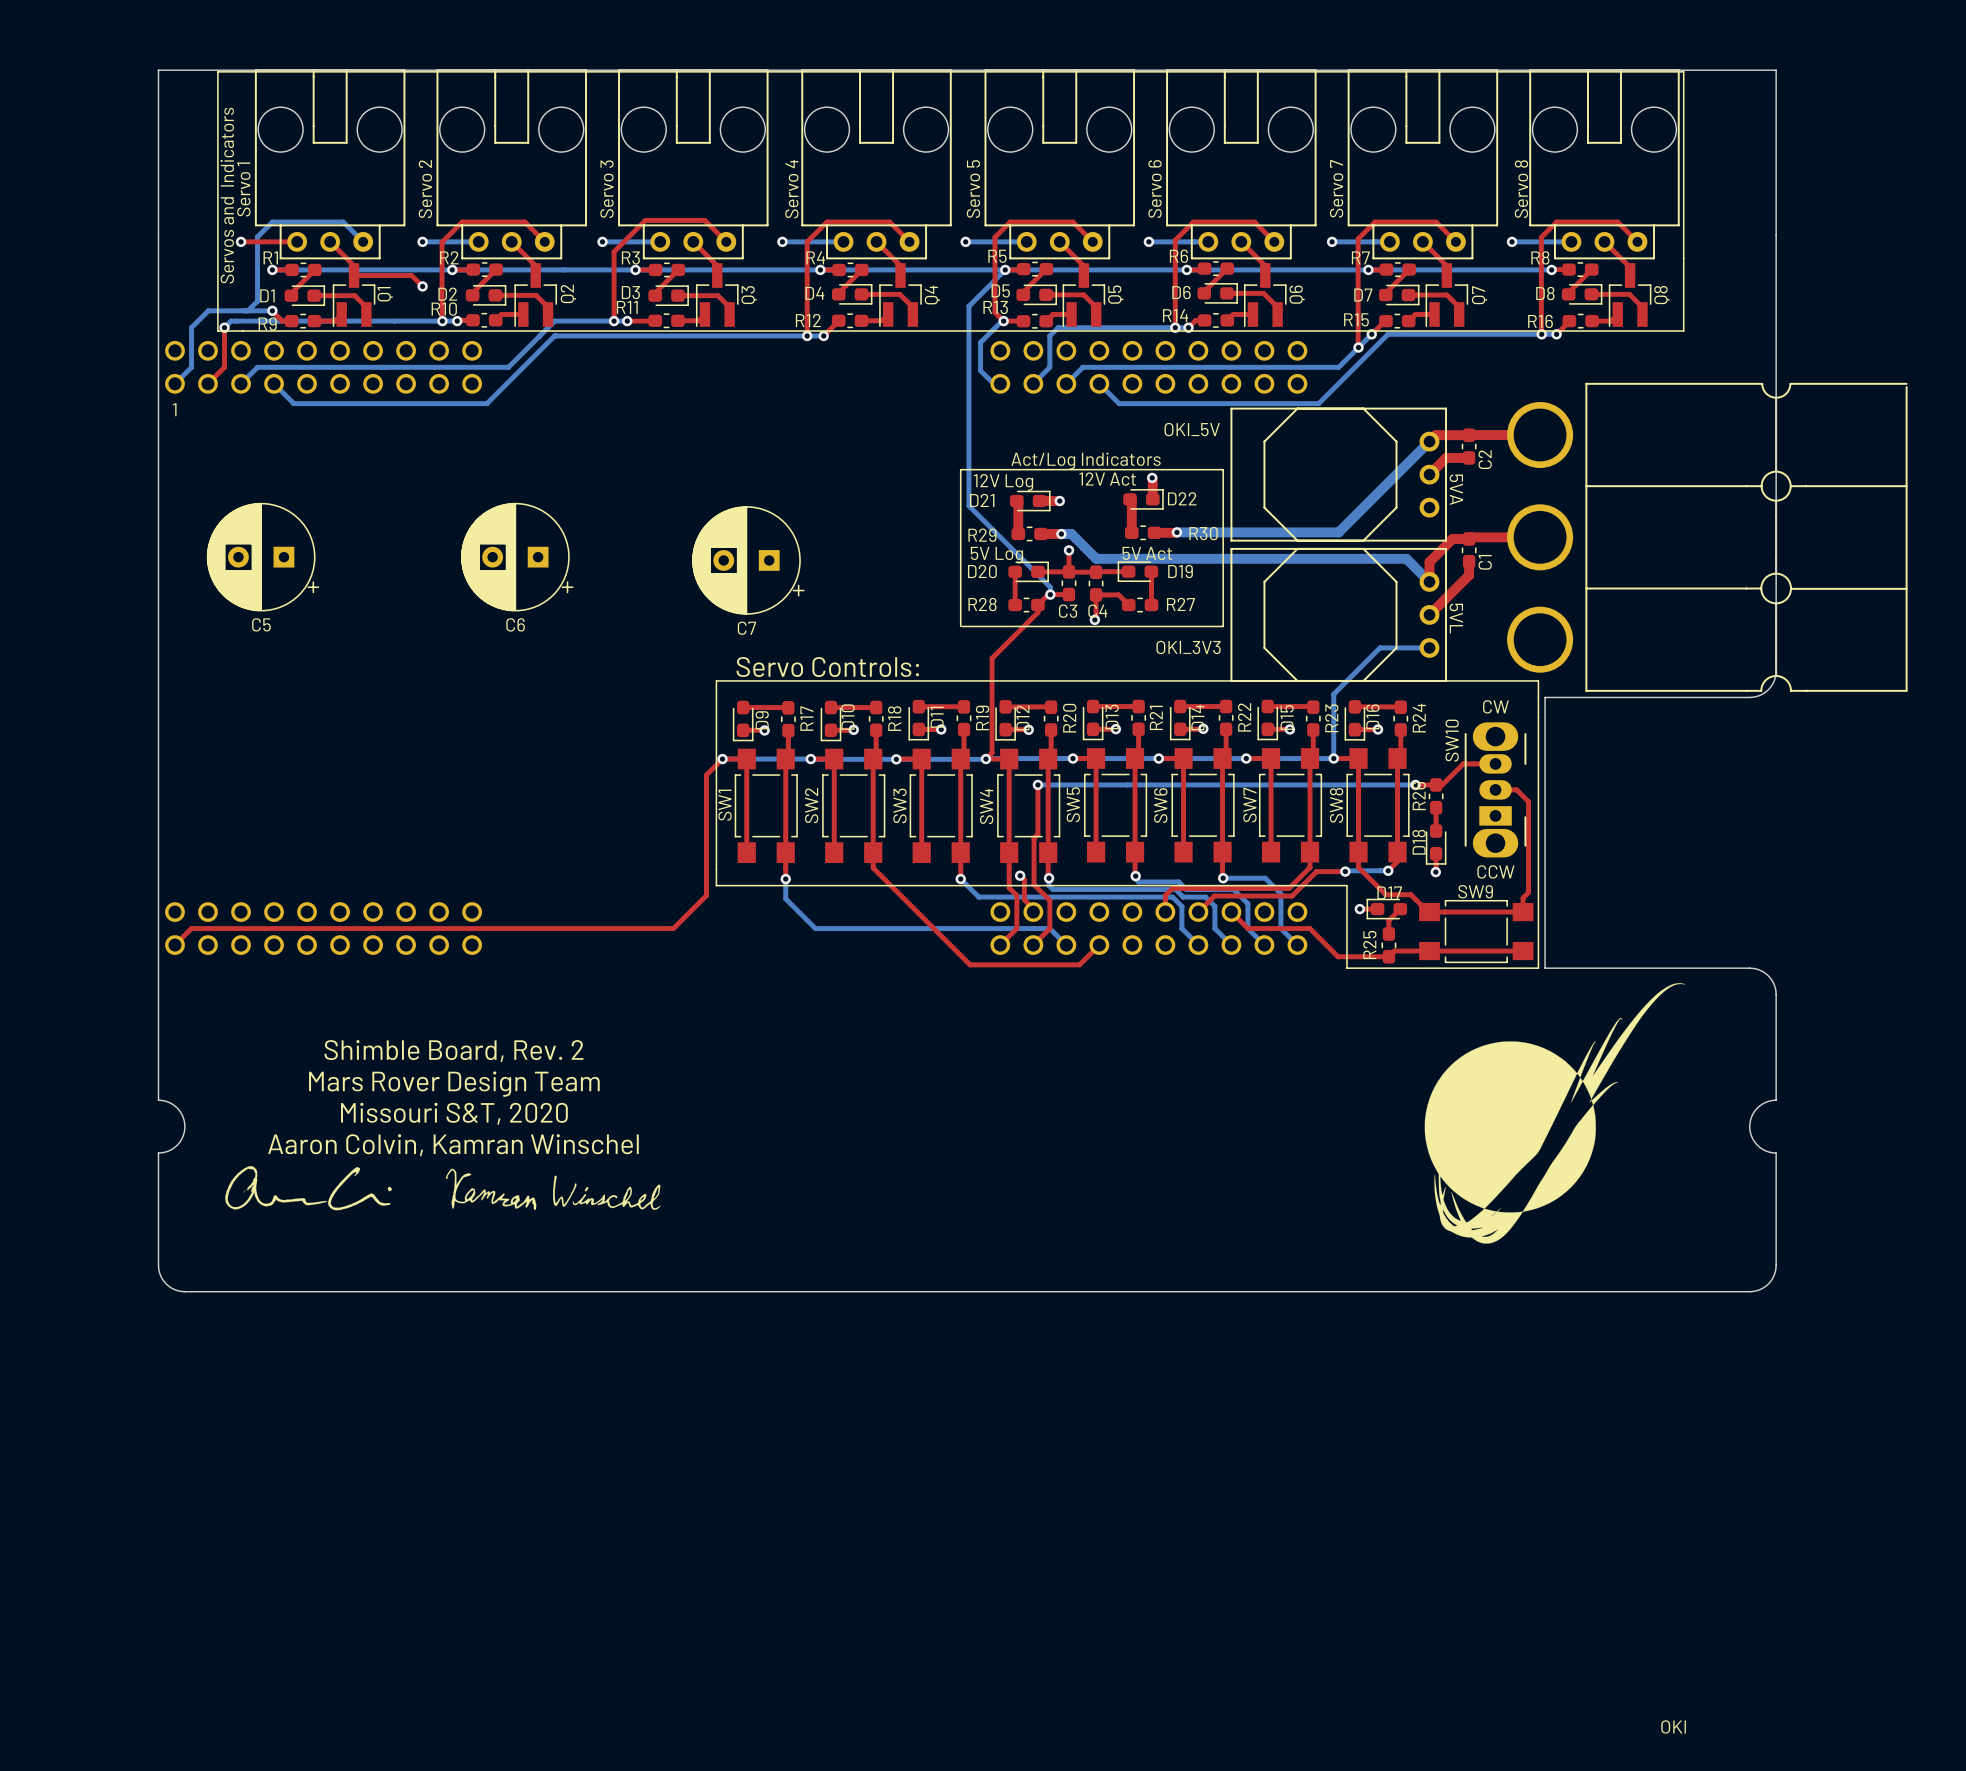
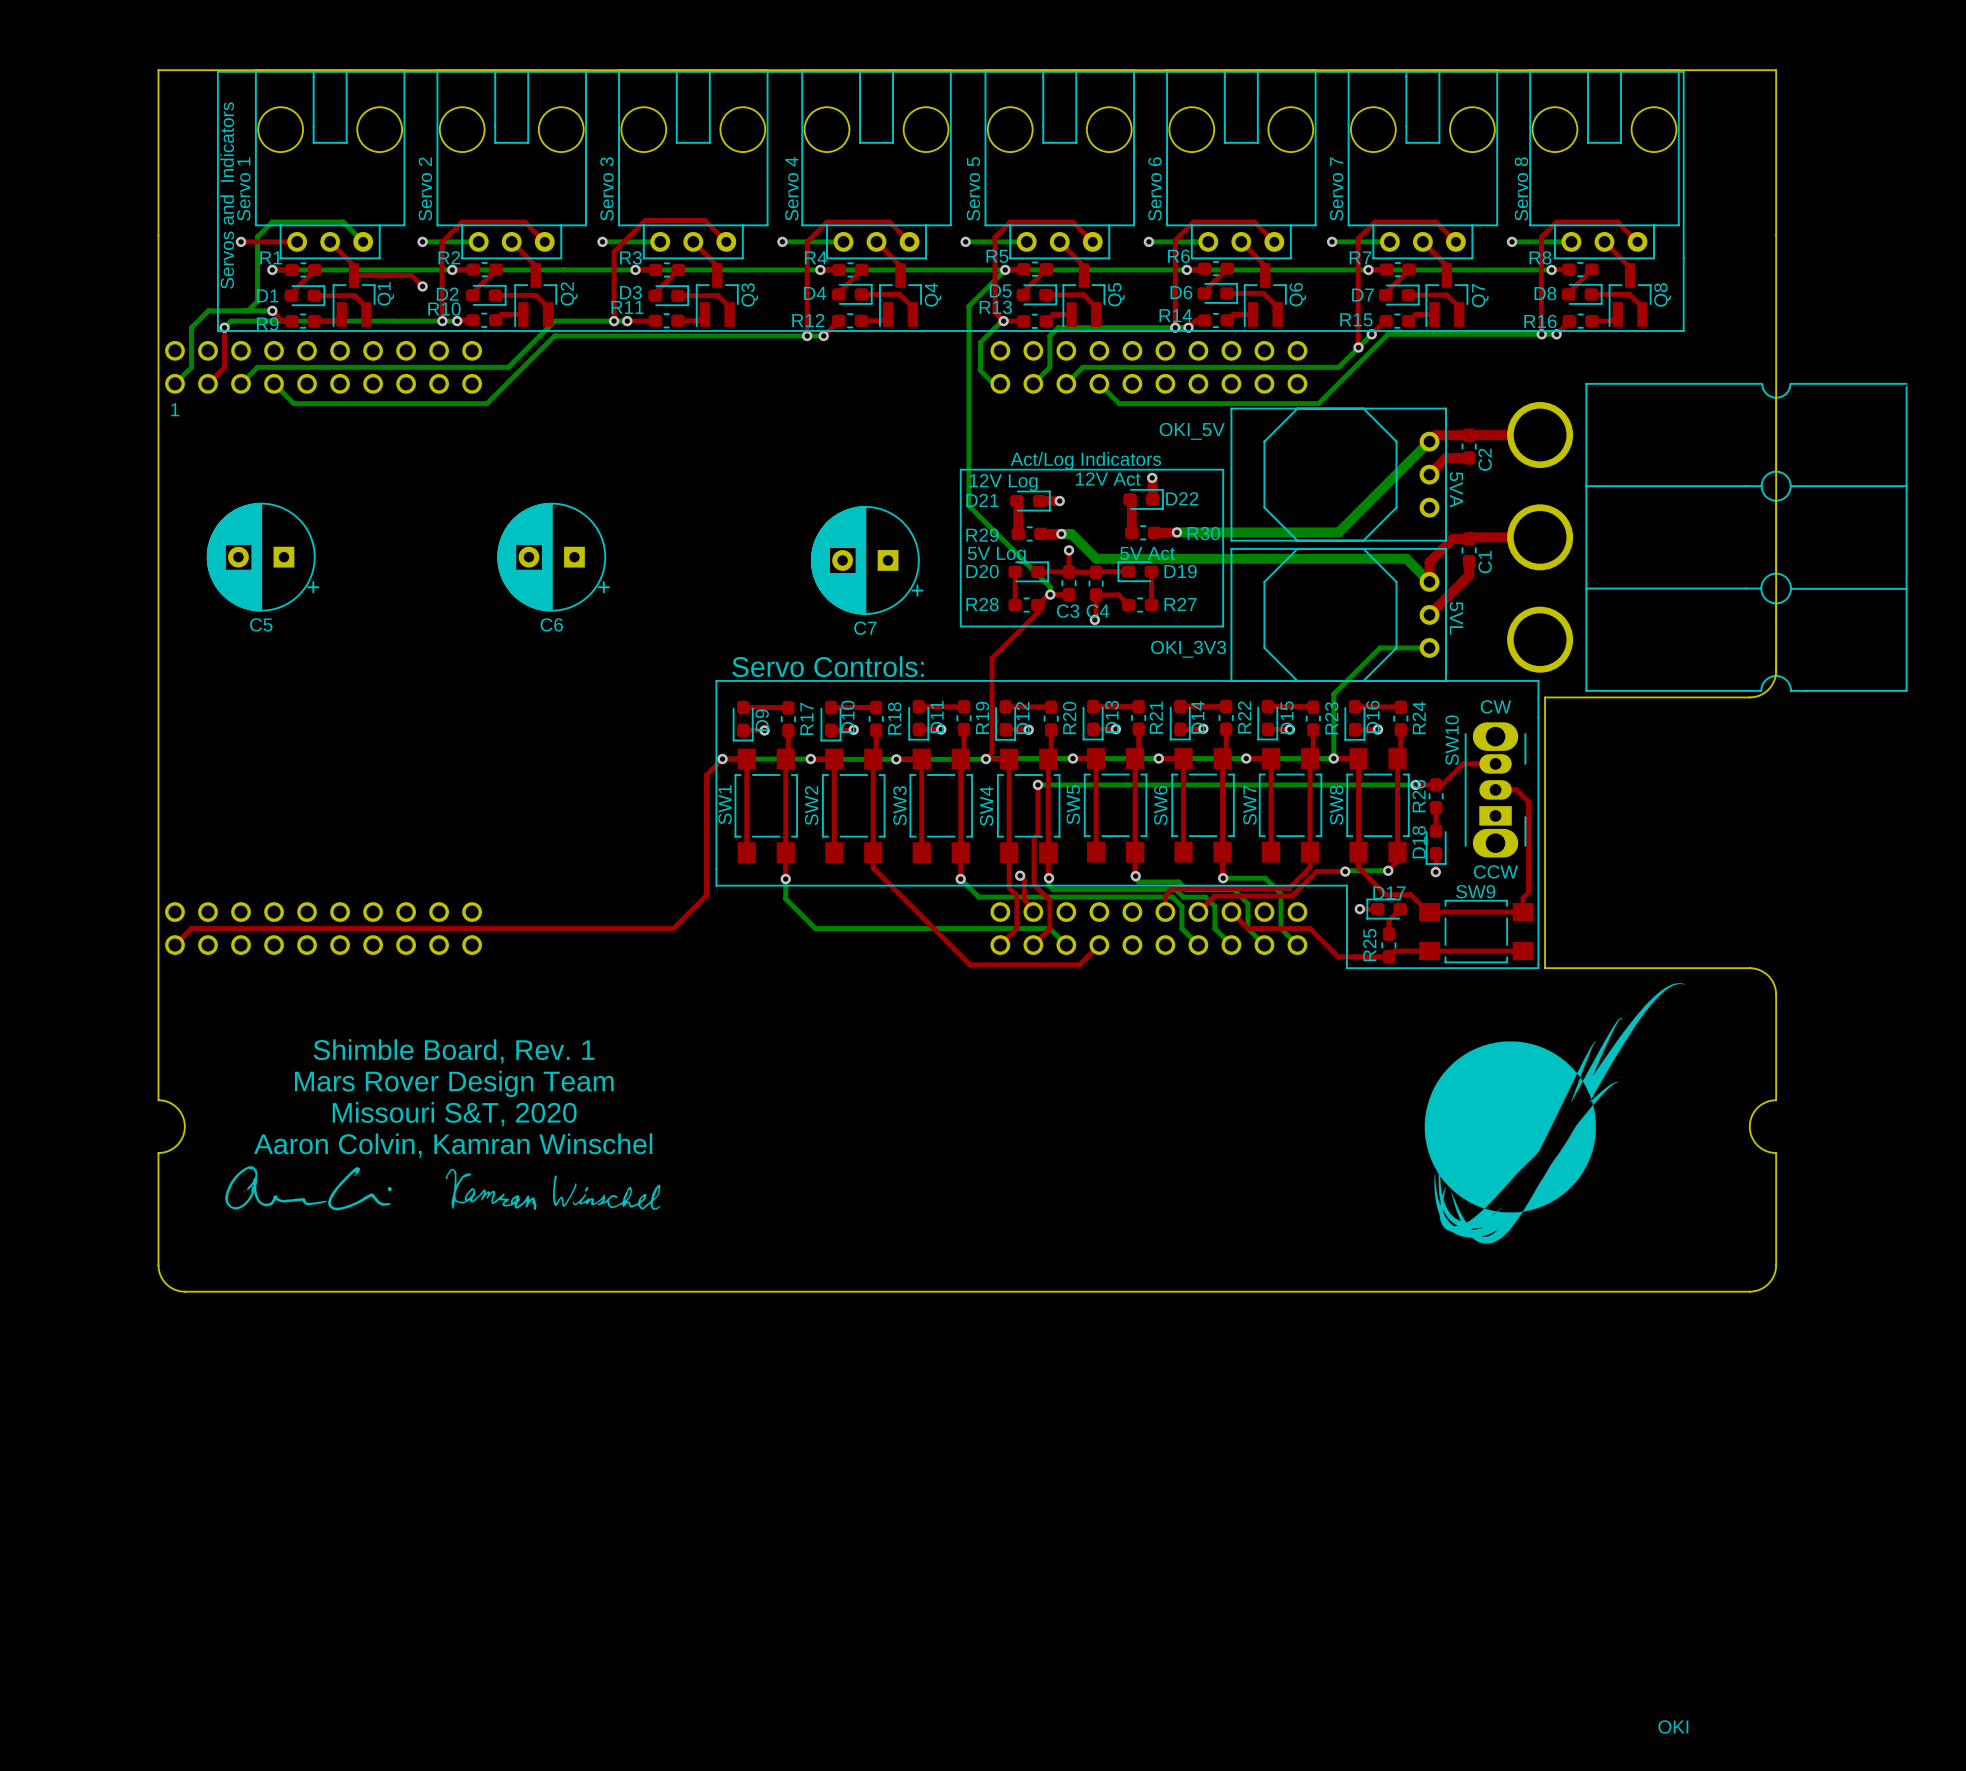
C6 position: (517, 557) -> (553, 557)
C7 position: (748, 560) -> (867, 560)
text: Shimble Board, Rev. 2 (454, 1051) -> Shimble Board, Rev. 1 (454, 1051)

